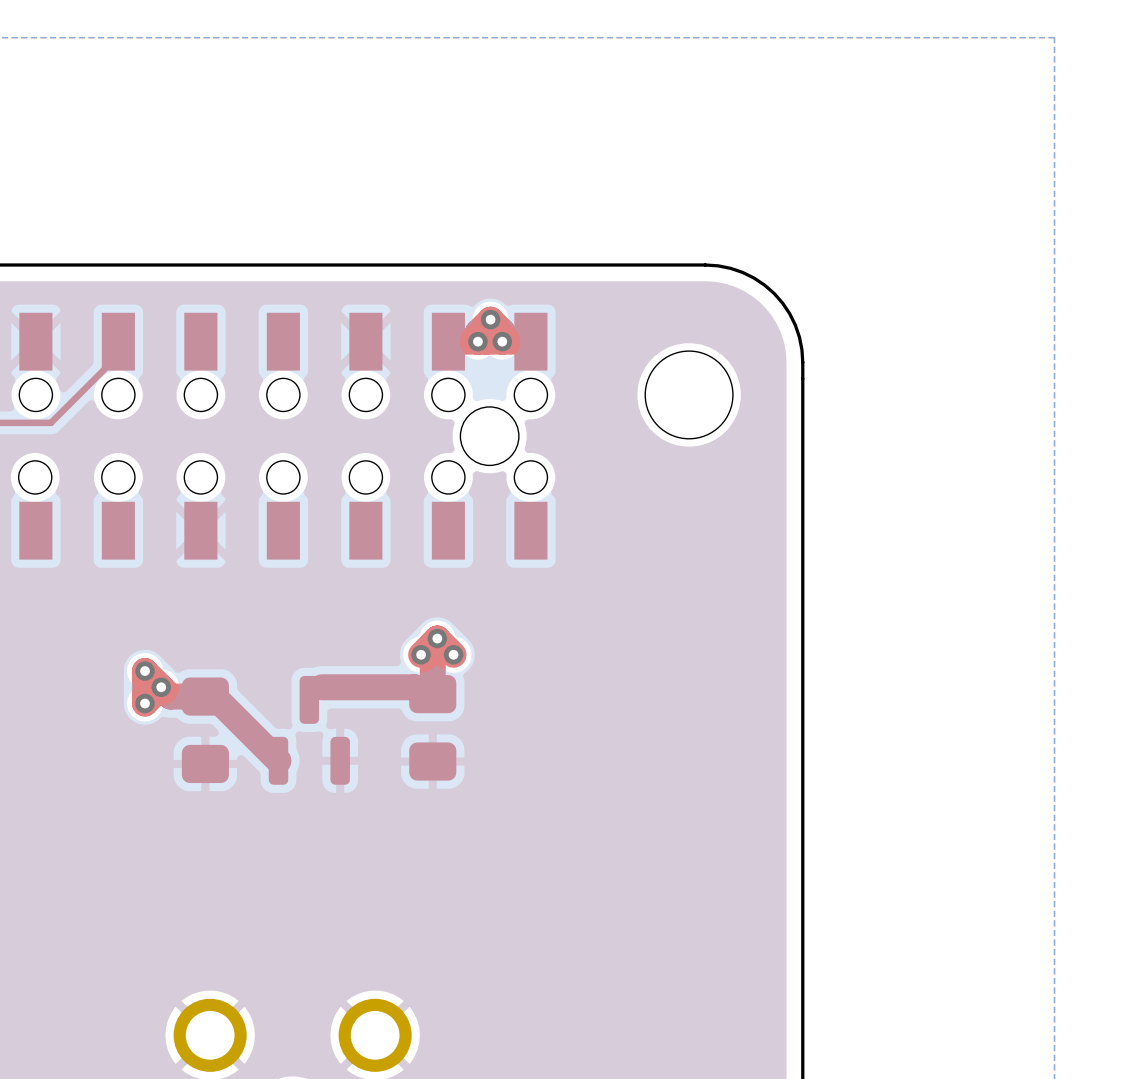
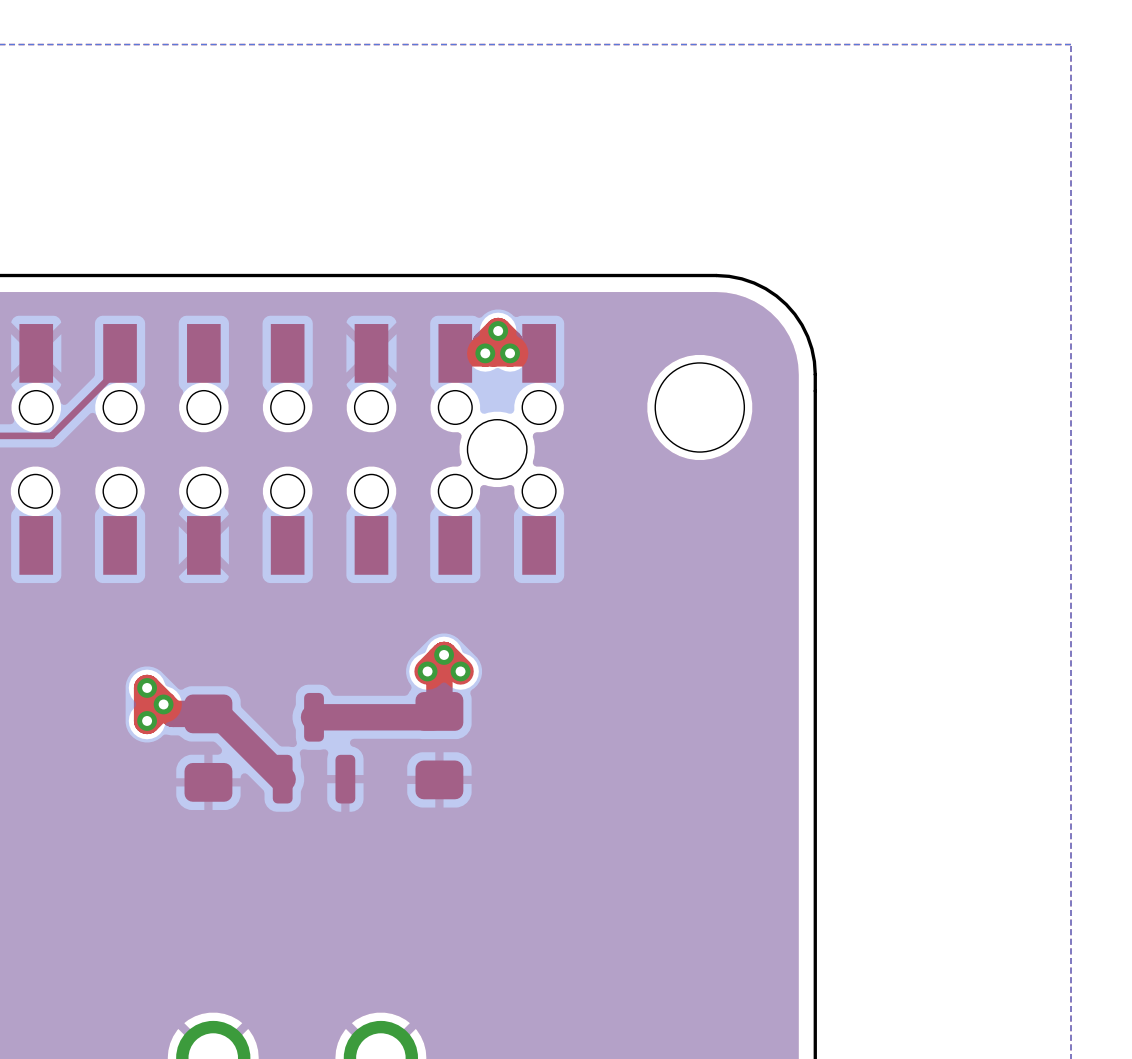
top track: (321, 687) (414, 687) (427, 699) -> (314, 717) (433, 717)

